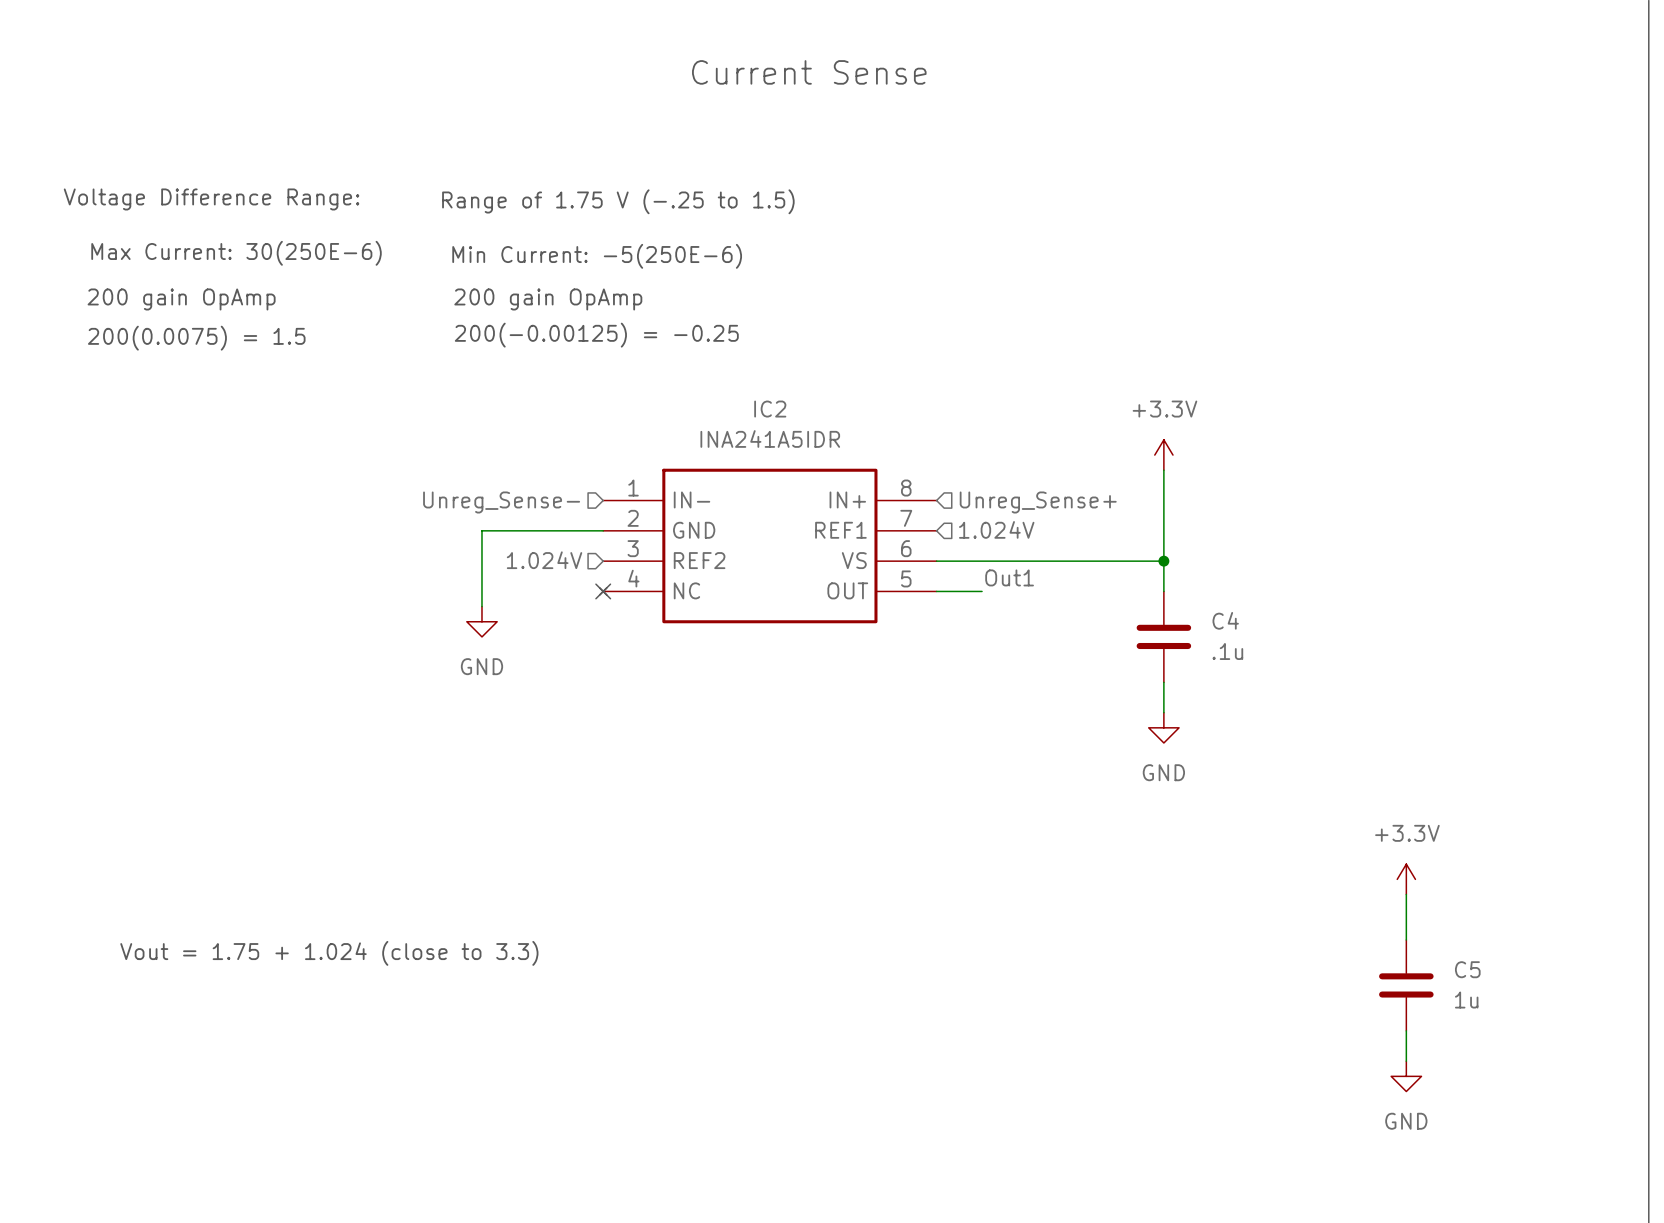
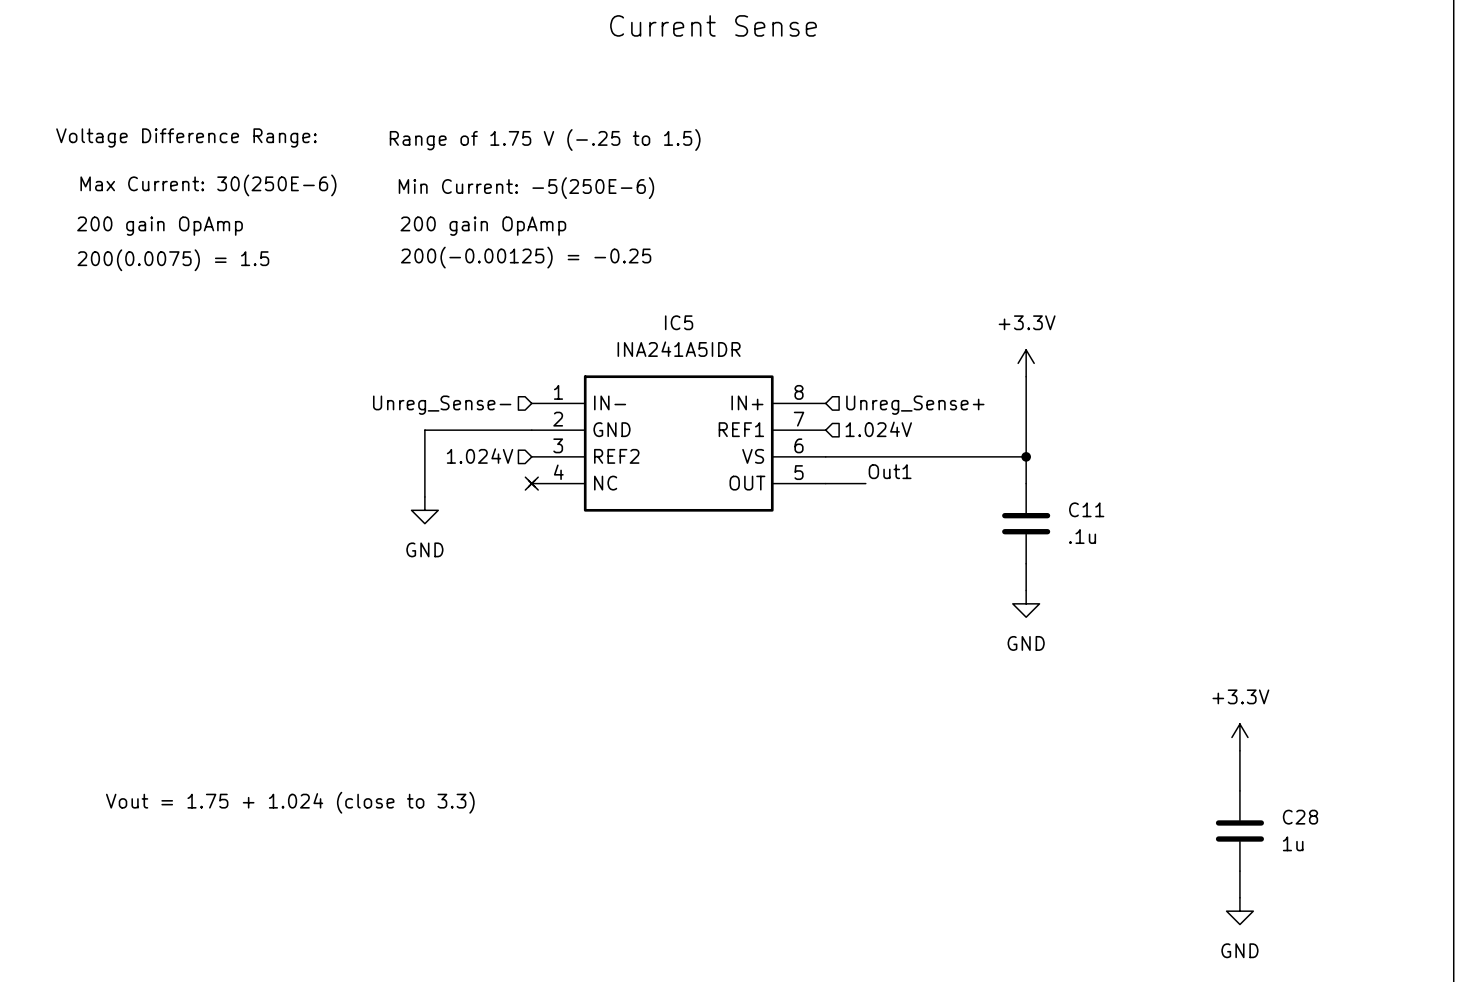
IC2 name: IC2 (770, 409) -> IC5 (679, 322)
C4 name: C4 (1225, 620) -> C11 (1086, 509)
C5 name: C5 (1467, 969) -> C28 (1300, 817)

